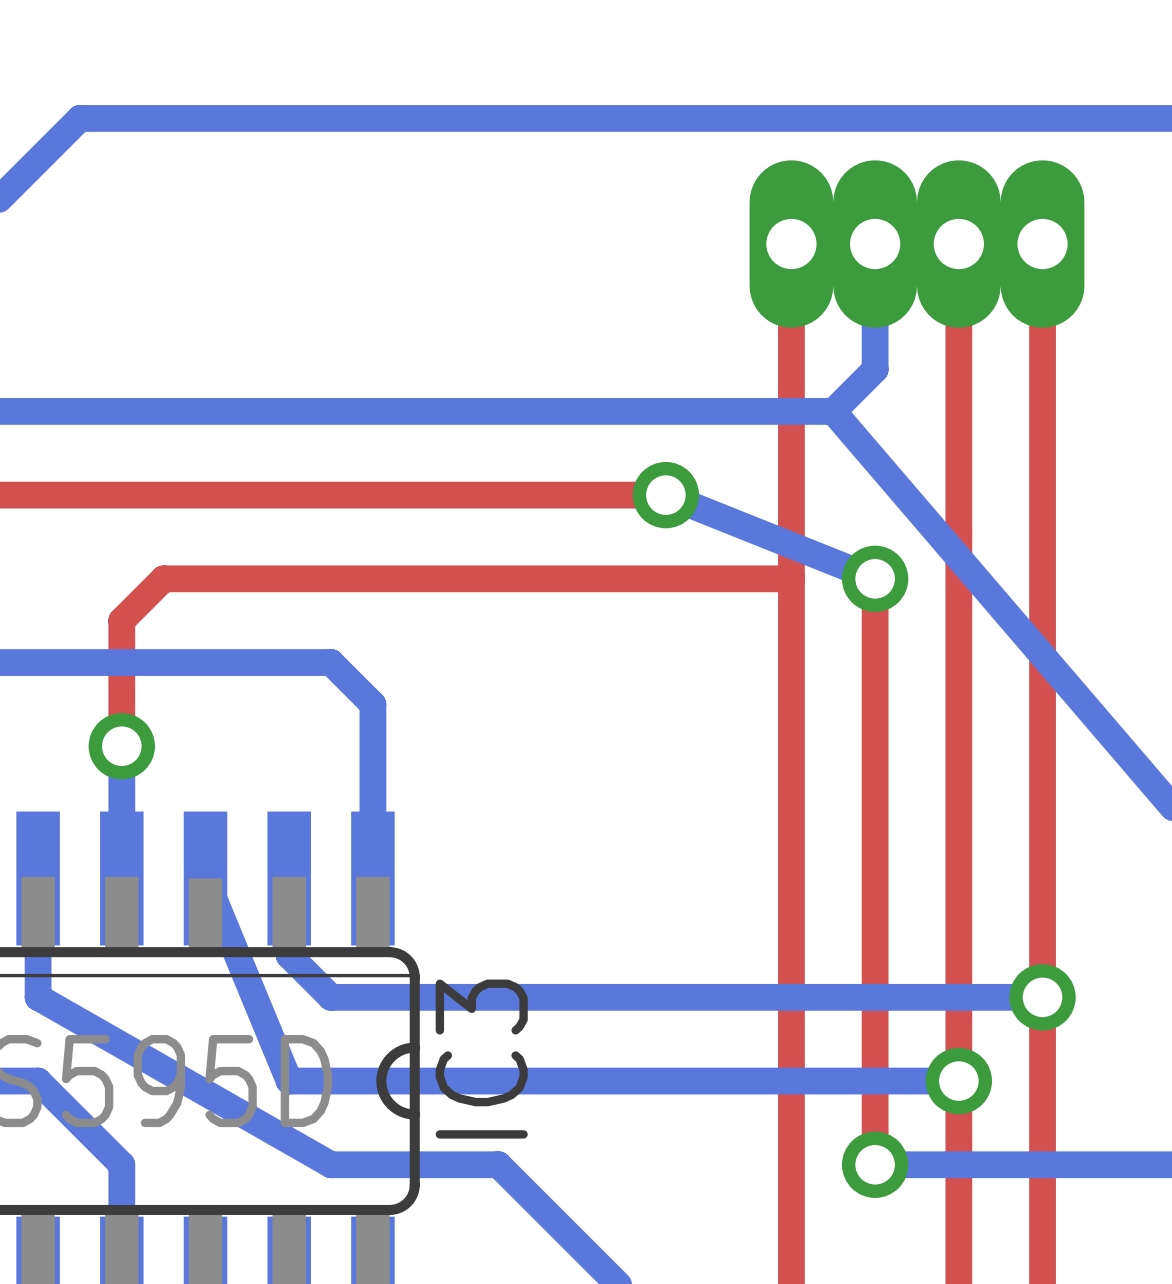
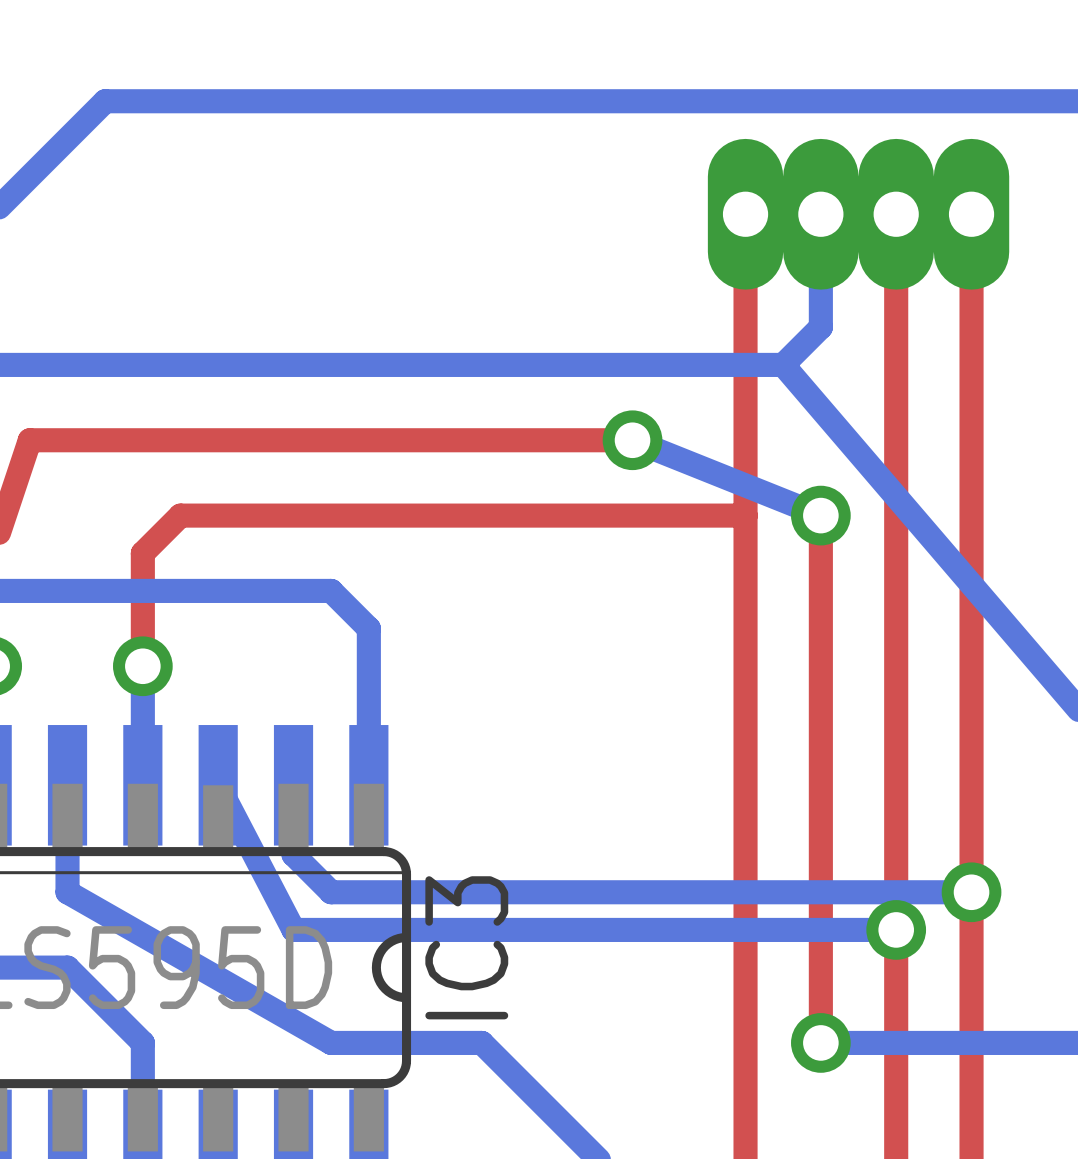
bottom track: (205, 878) (289, 1081) (958, 1081) -> (218, 785) (293, 929) (896, 929)
via position: (958, 1081) -> (896, 929)

